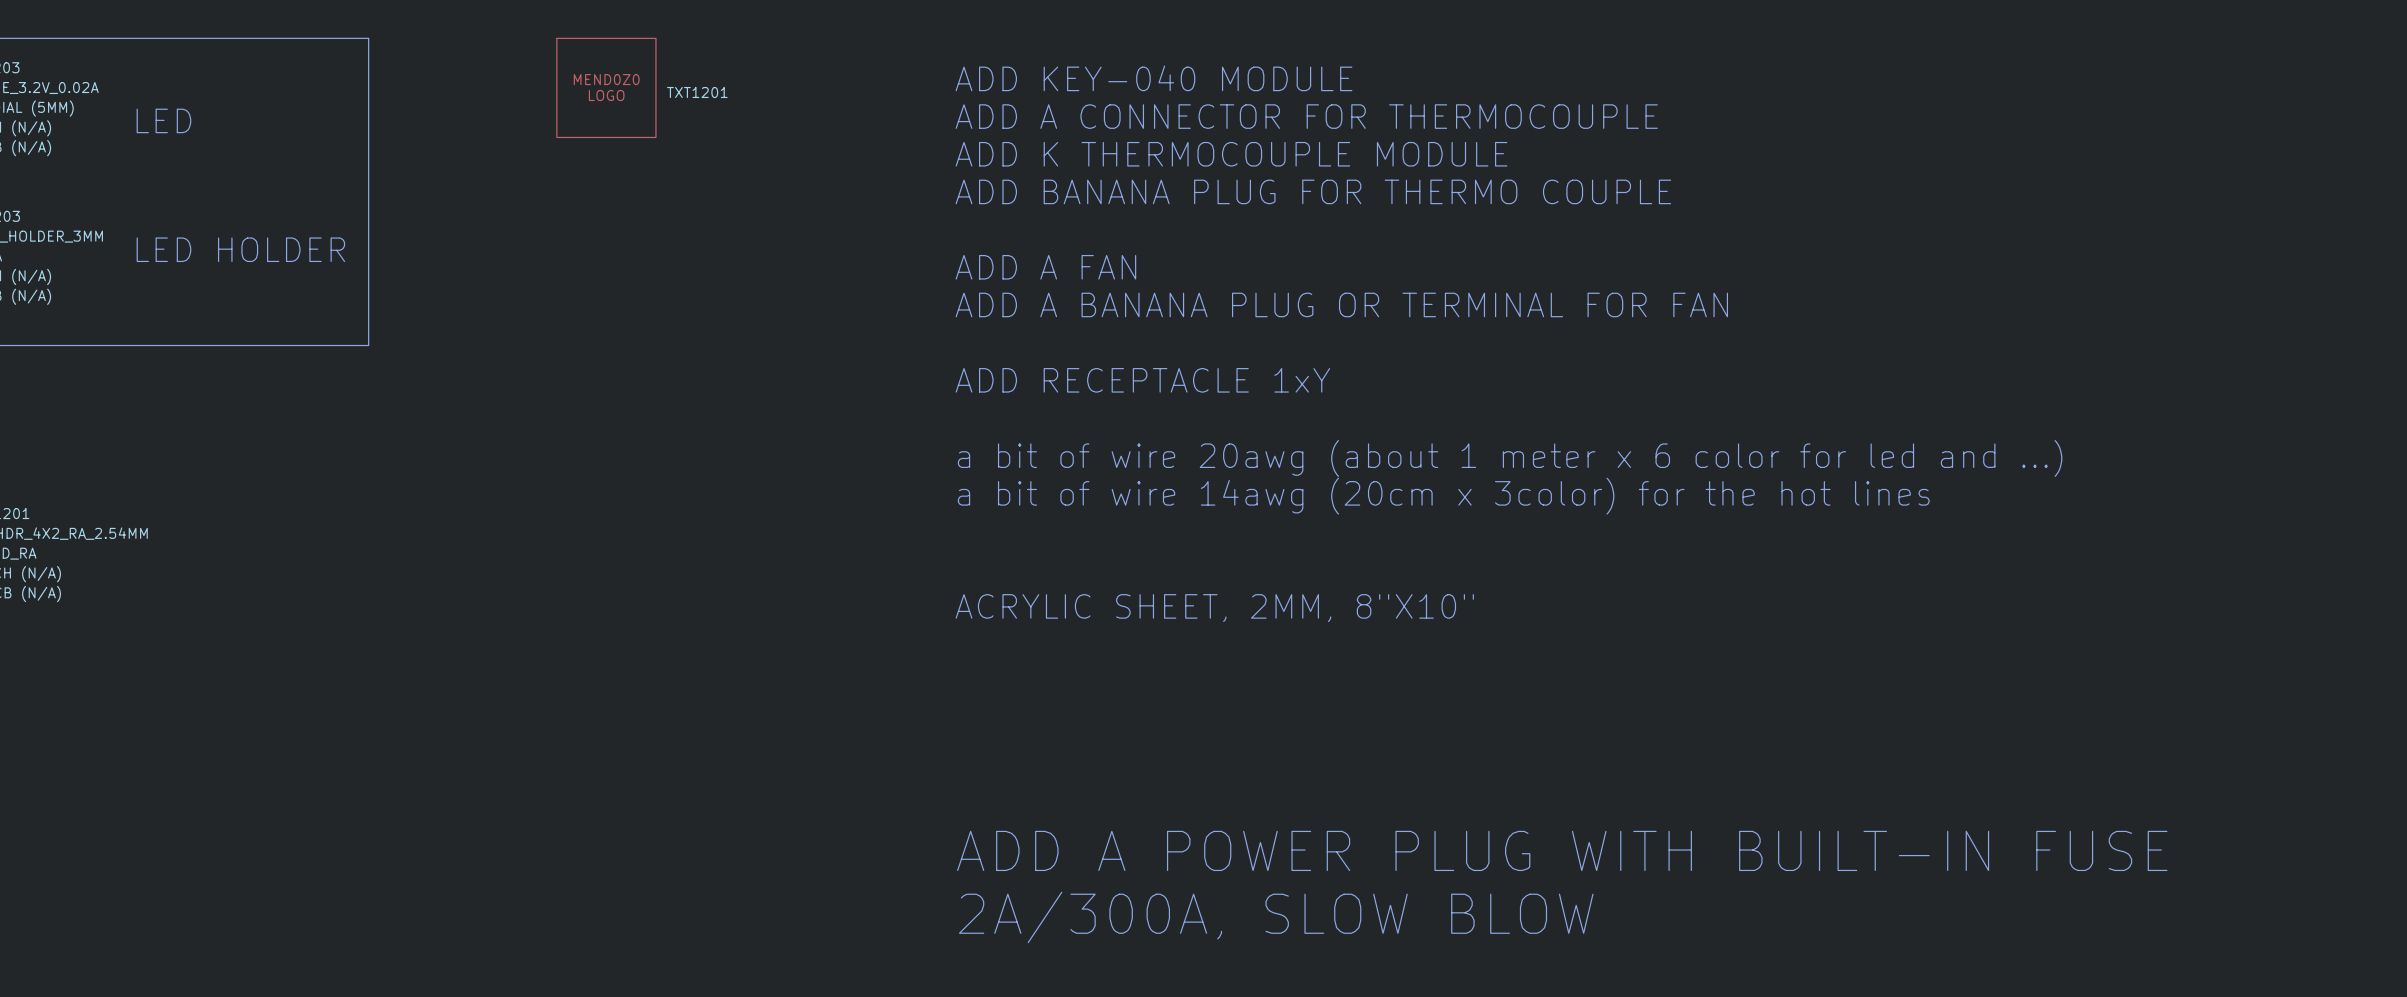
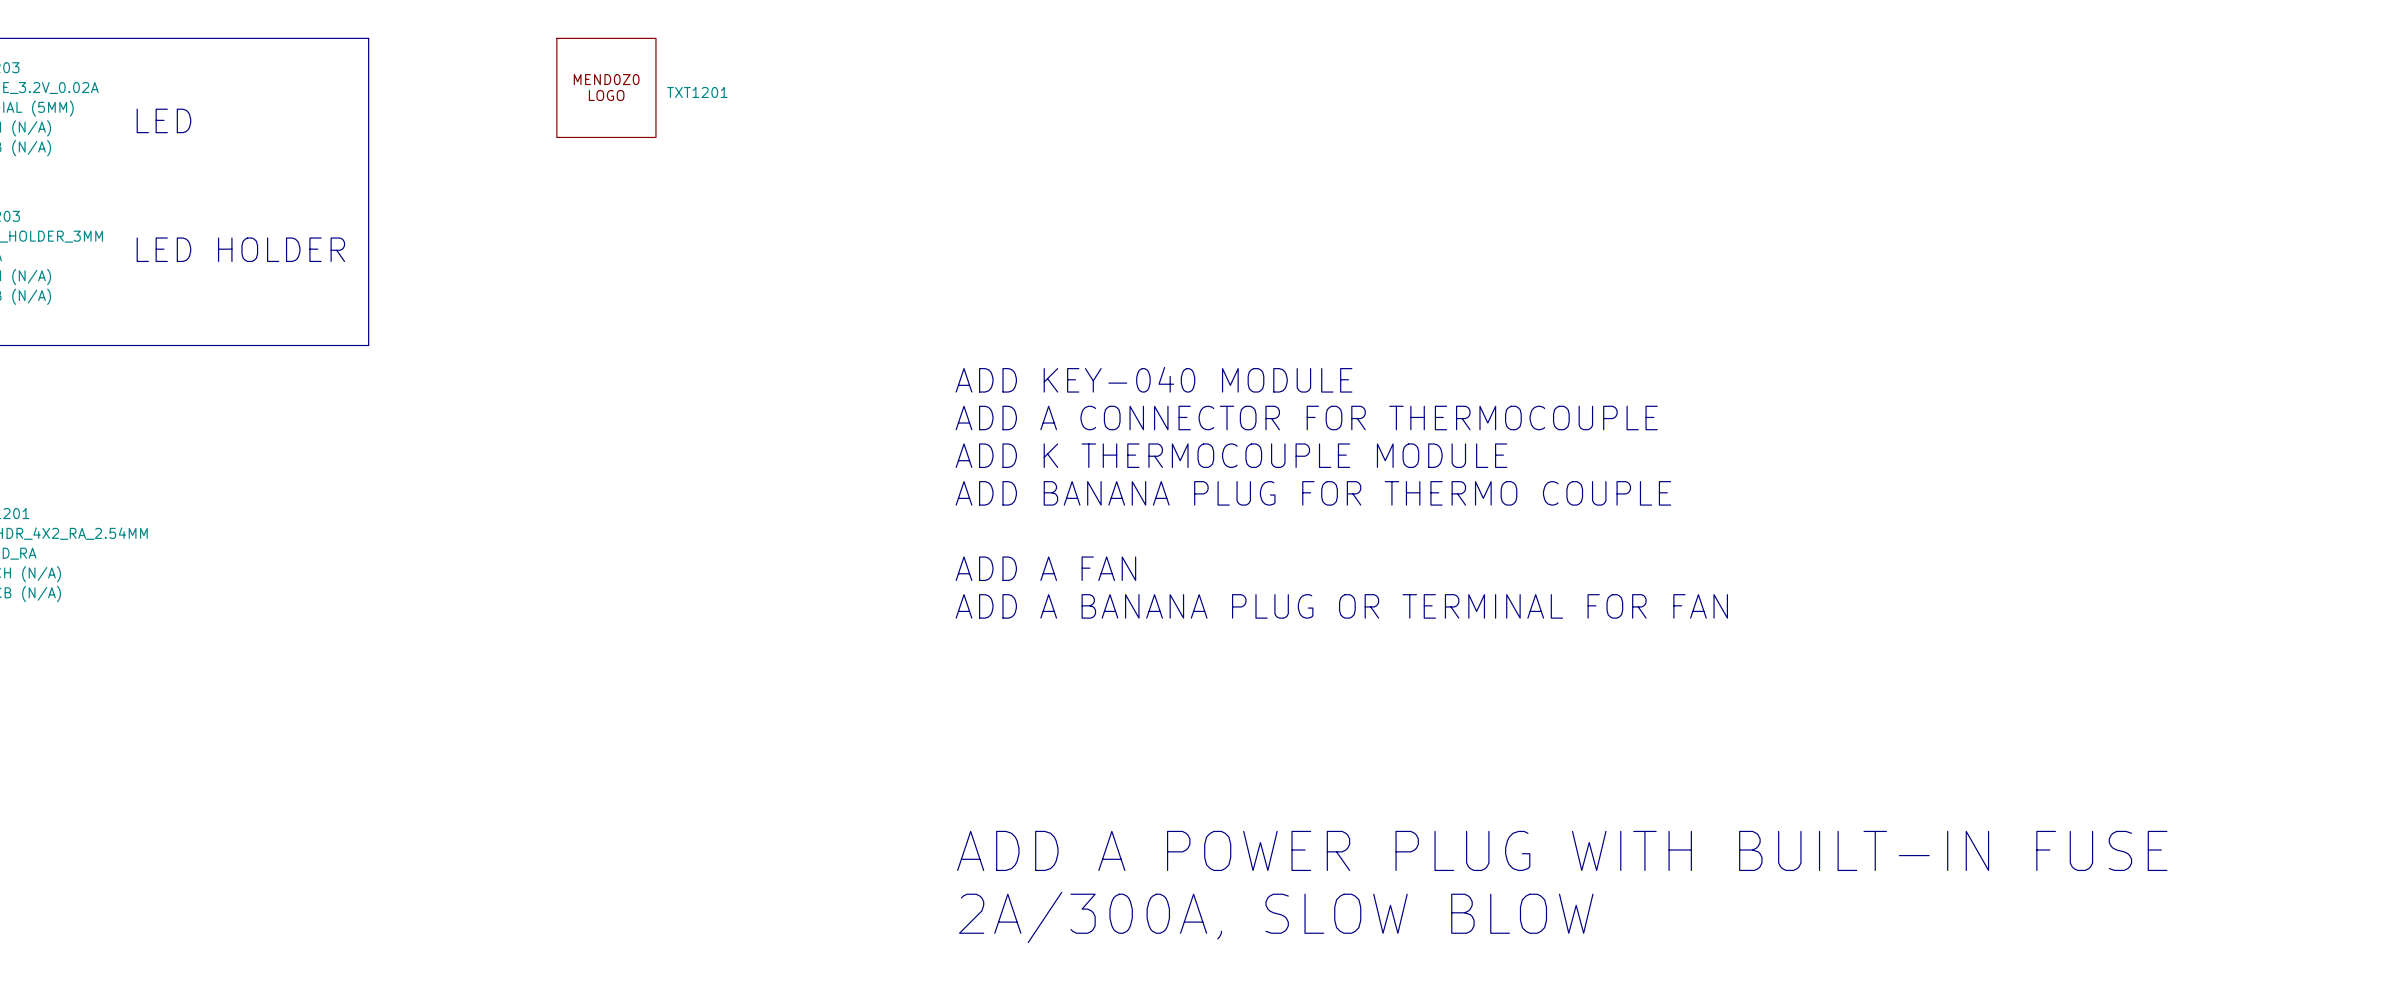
text: ADD KEY-040 MODULE (1154, 78) -> none
text: ADD A CONNECTOR FOR THERMOCOUPLE (1306, 116) -> none
text: ADD K THERMOCOUPLE MODULE (1231, 154) -> none
text: ADD BANANA PLUG FOR THERMO COUPLE (1313, 191) -> none
text: ADD A FAN (1045, 267) -> none
text: ADD A BANANA PLUG OR TERMINAL FOR FAN (1341, 304) -> none
text: ADD RECEPTACLE 1xY (1142, 380) -> ADD KEY-040 MODULE (1154, 379)
text: none -> ADD A CONNECTOR FOR THERMOCOUPLE (1306, 418)
text: a bit of wire 20awg (about 1 meter x 6 color for led and ...) (1510, 458) -> ADD K THERMOCOUPLE MODULE (1231, 455)
text: a bit of wire 14awg (20cm x 3color) for the hot lines (1443, 496) -> ADD BANANA PLUG FOR THERMO COUPLE (1313, 493)
text: none -> ADD A FAN (1045, 568)
text: ACRYLIC SHEET, 2MM, 8"X10" (1214, 608) -> ADD A BANANA PLUG OR TERMINAL FOR FAN (1341, 606)

